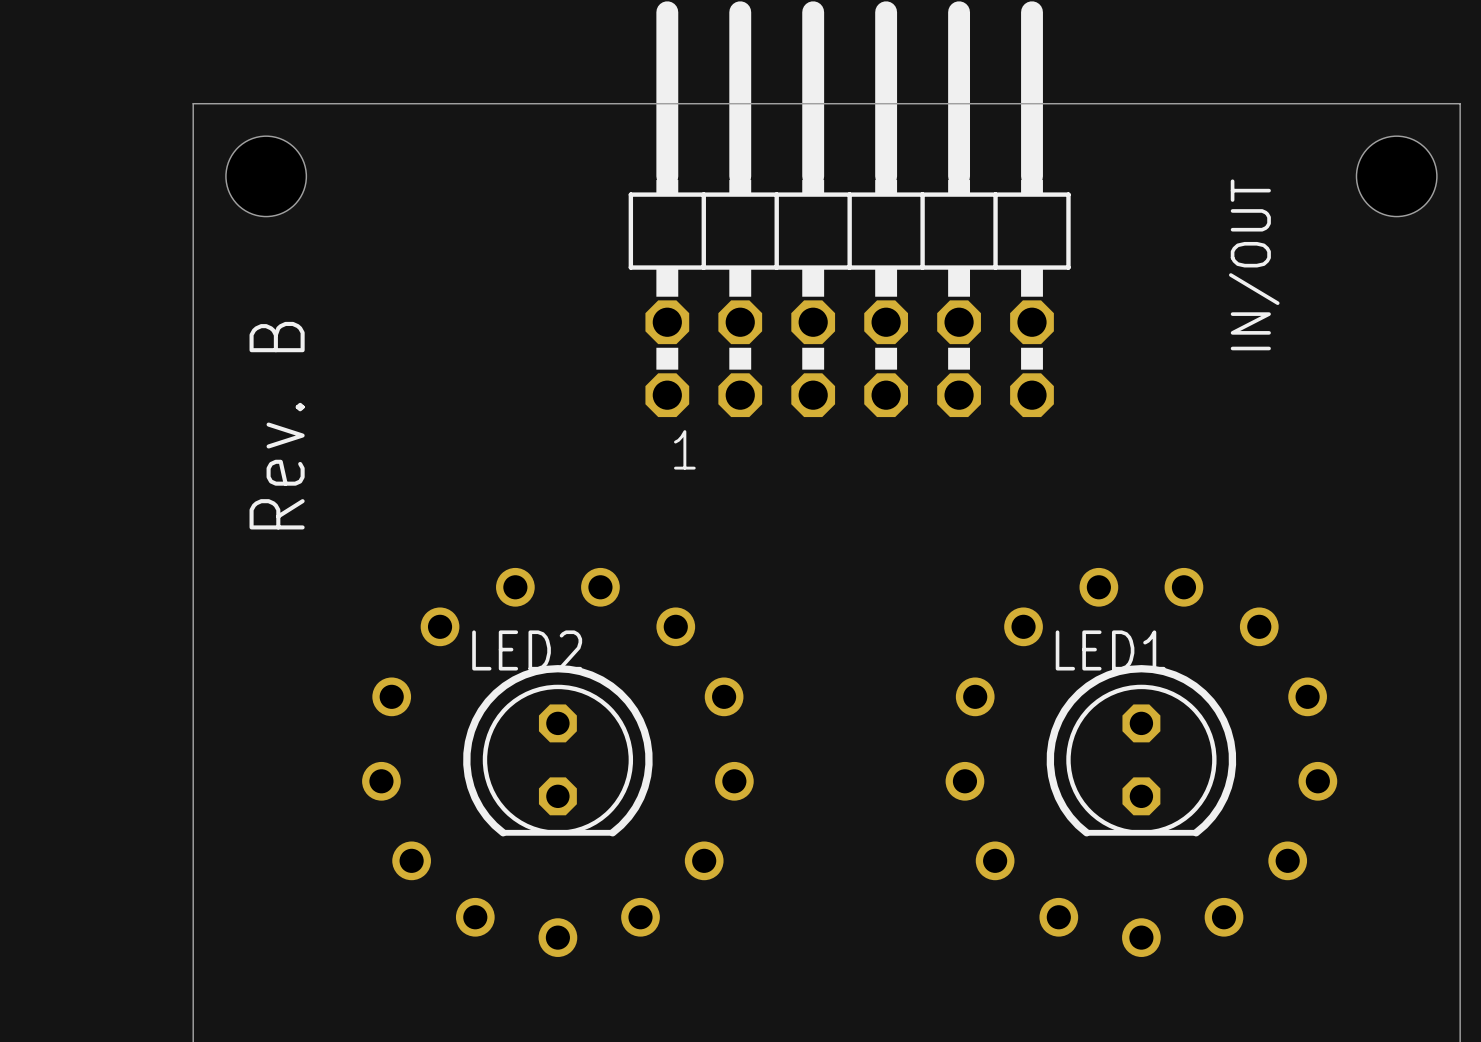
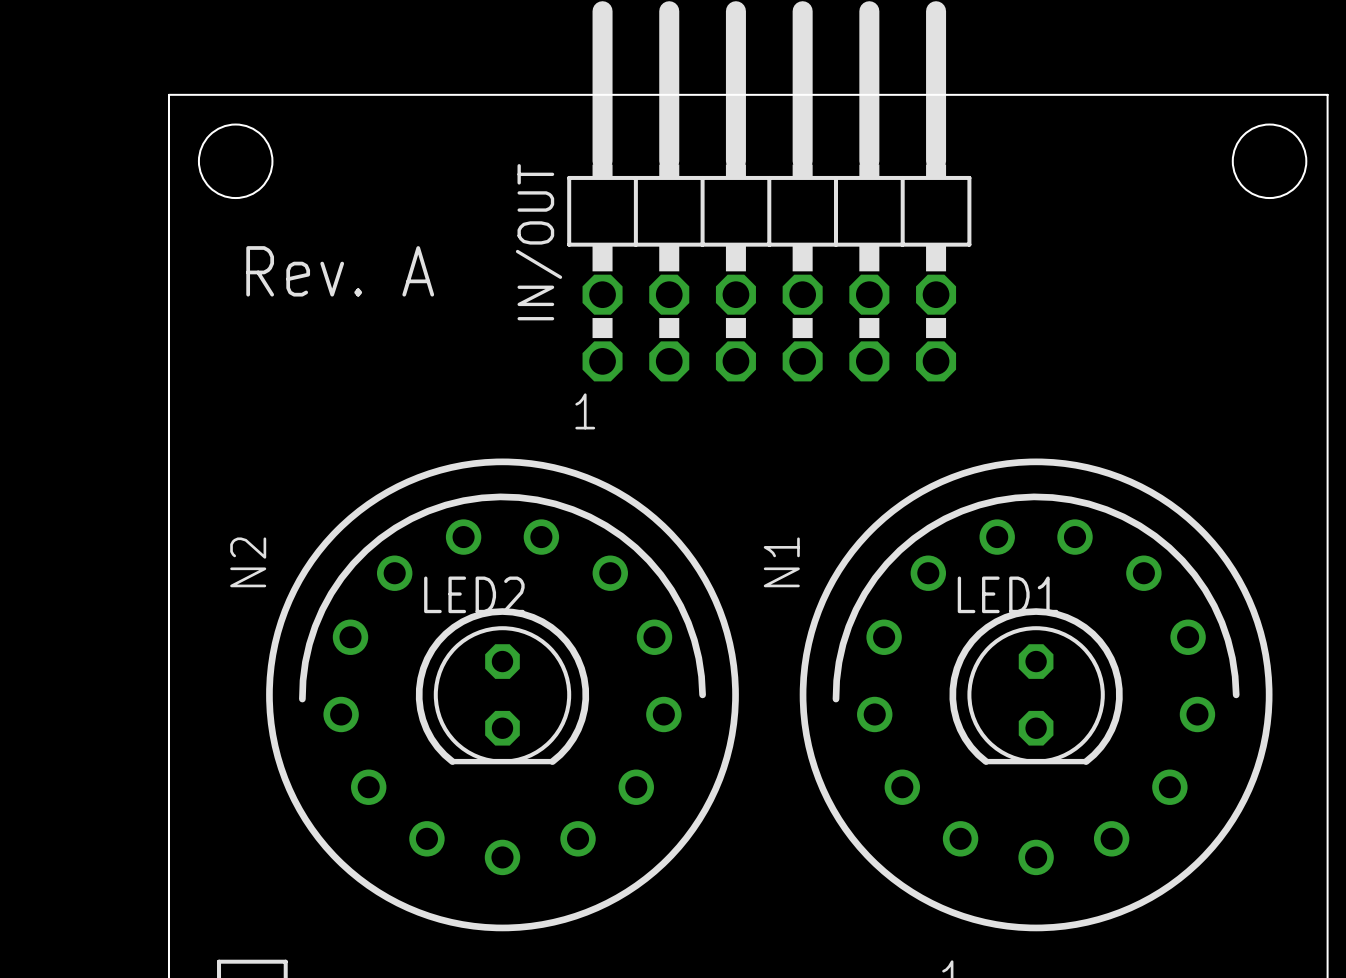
IN/OUT name position: IN/OUT (1254, 264) -> IN/OUT (539, 242)
text: Rev. B (277, 425) -> Rev. A (340, 271)
text position: 1 (684, 449) -> 1 (585, 411)
N2 side: bottom (557, 762) -> top (502, 694)
N1 side: bottom (1141, 762) -> top (1036, 694)

